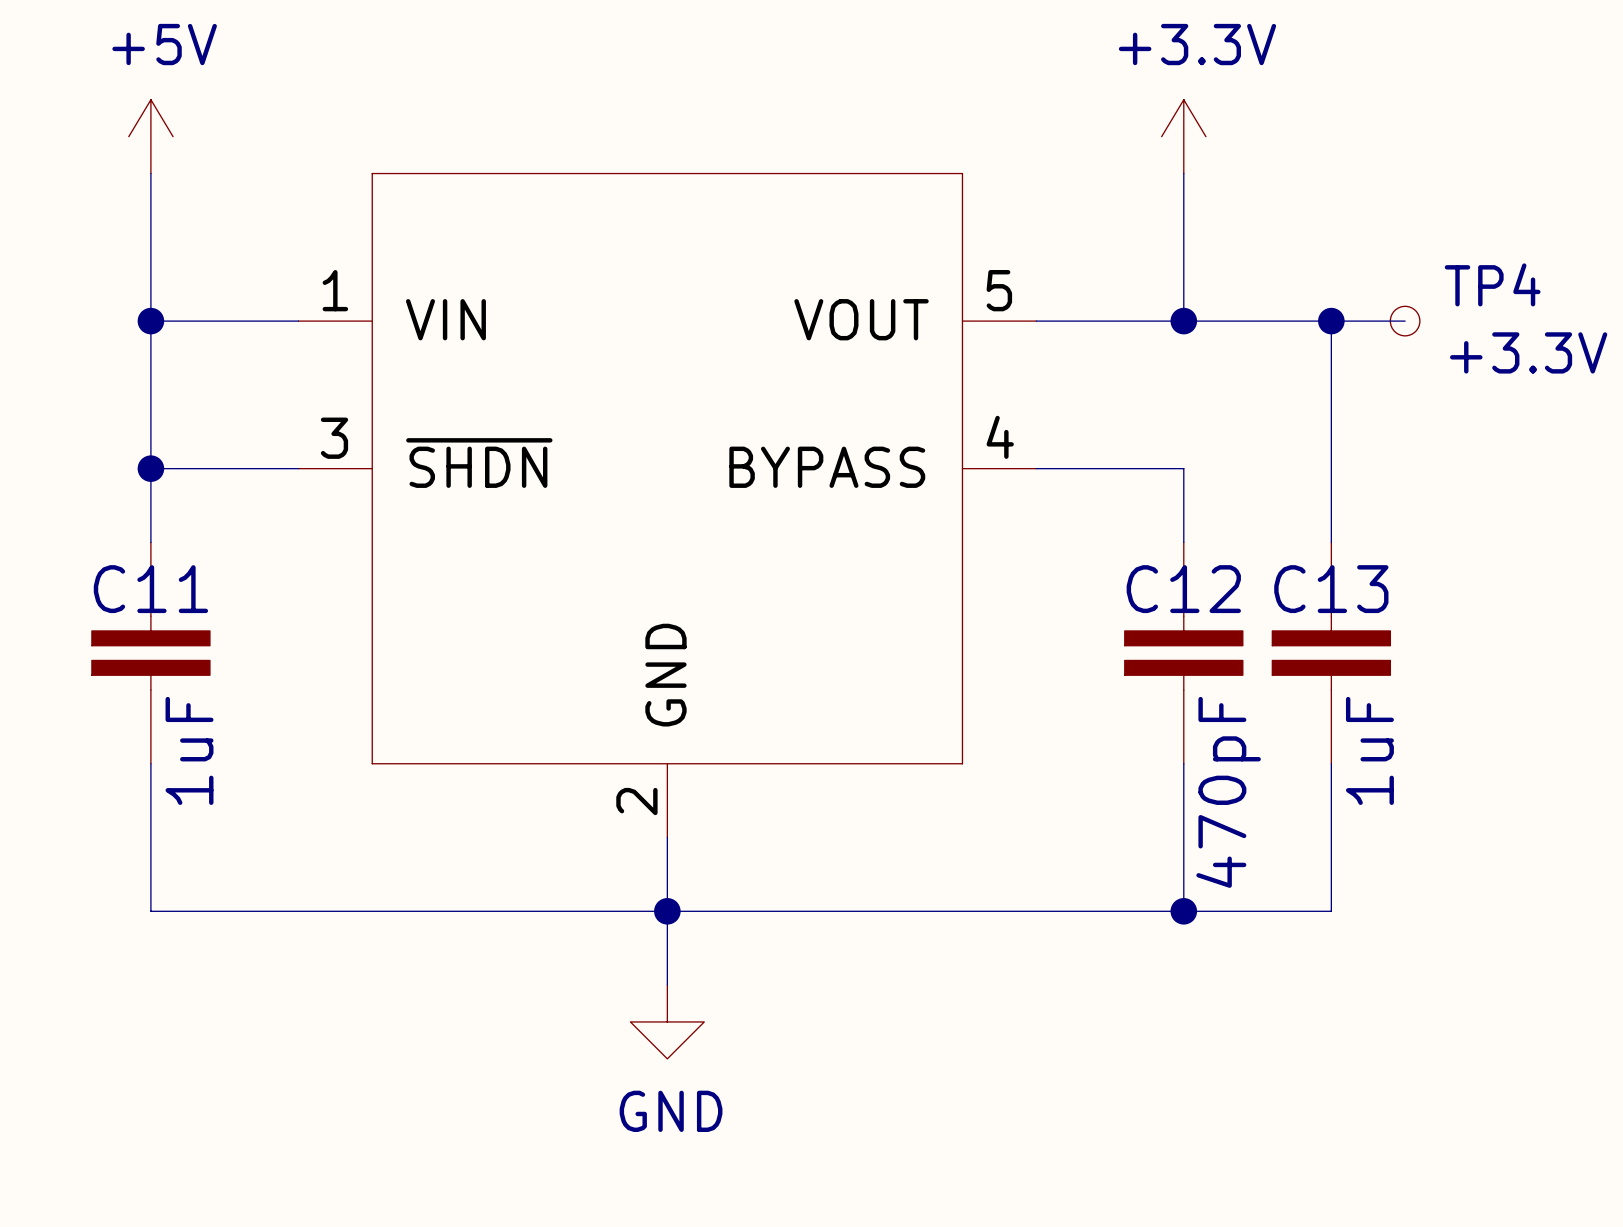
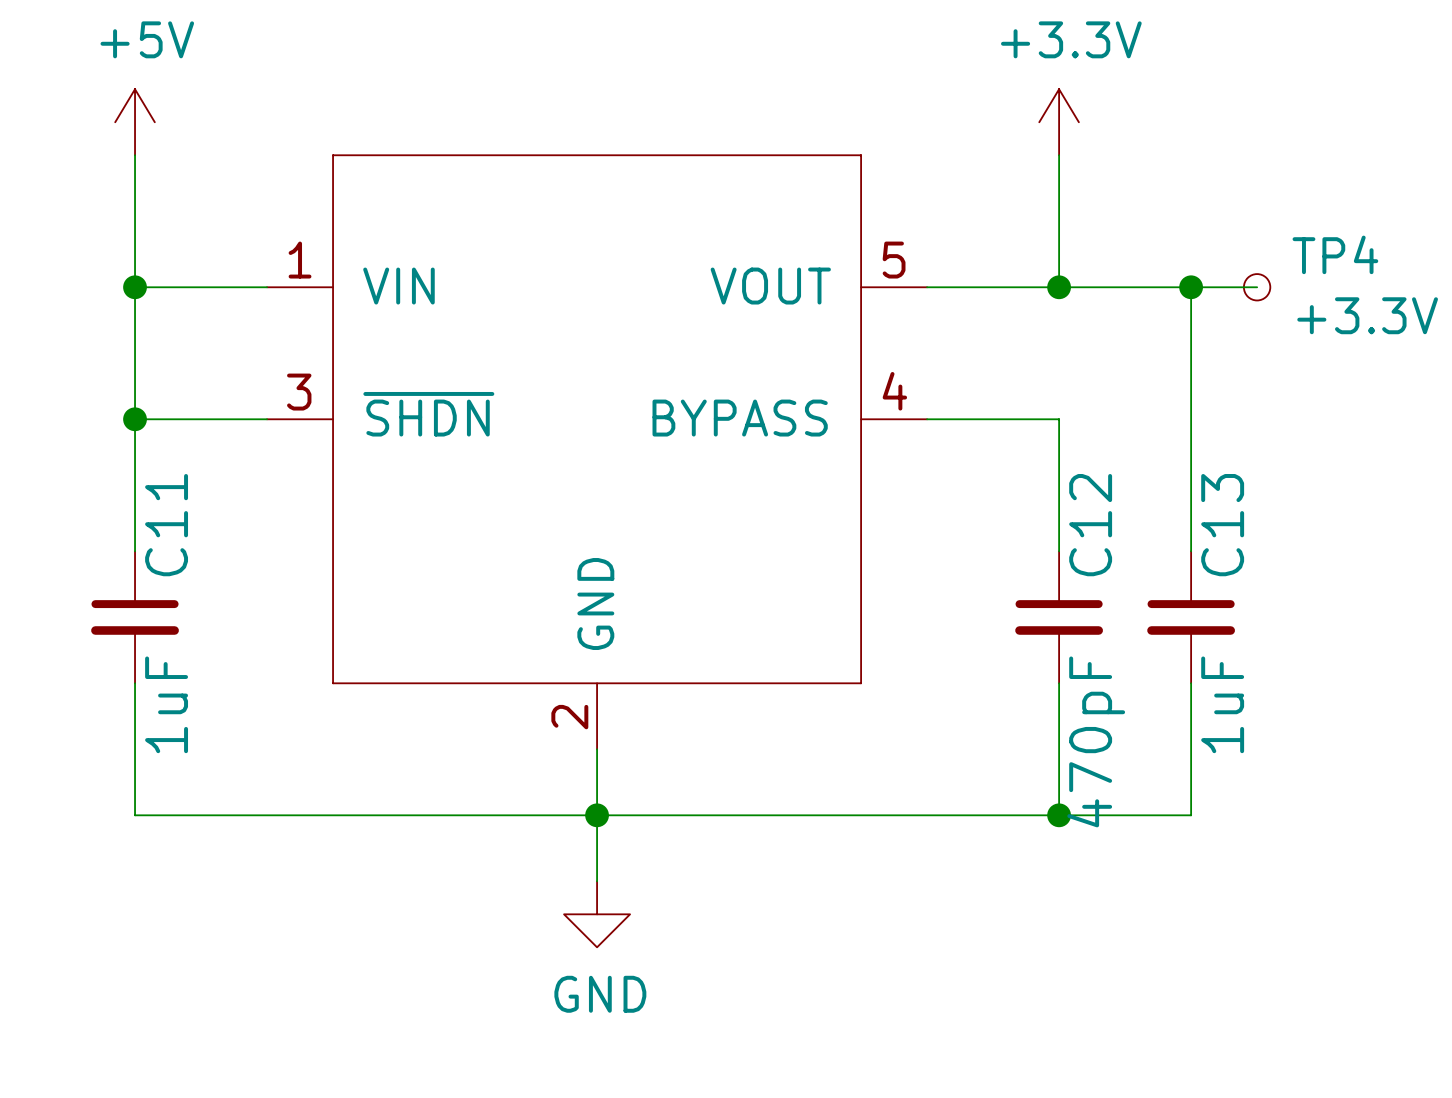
C11 symbol: [91, 542, 210, 764] -> [91, 551, 179, 684]
C12 symbol: [1124, 542, 1243, 764] -> [1015, 551, 1103, 684]
C13 symbol: [1272, 542, 1391, 764] -> [1147, 551, 1236, 684]
C11 name position: C11 (150, 589) -> C11 (166, 525)
C12 name position: C12 (1183, 589) -> C12 (1090, 525)
C13 name position: C13 (1331, 589) -> C13 (1222, 525)

